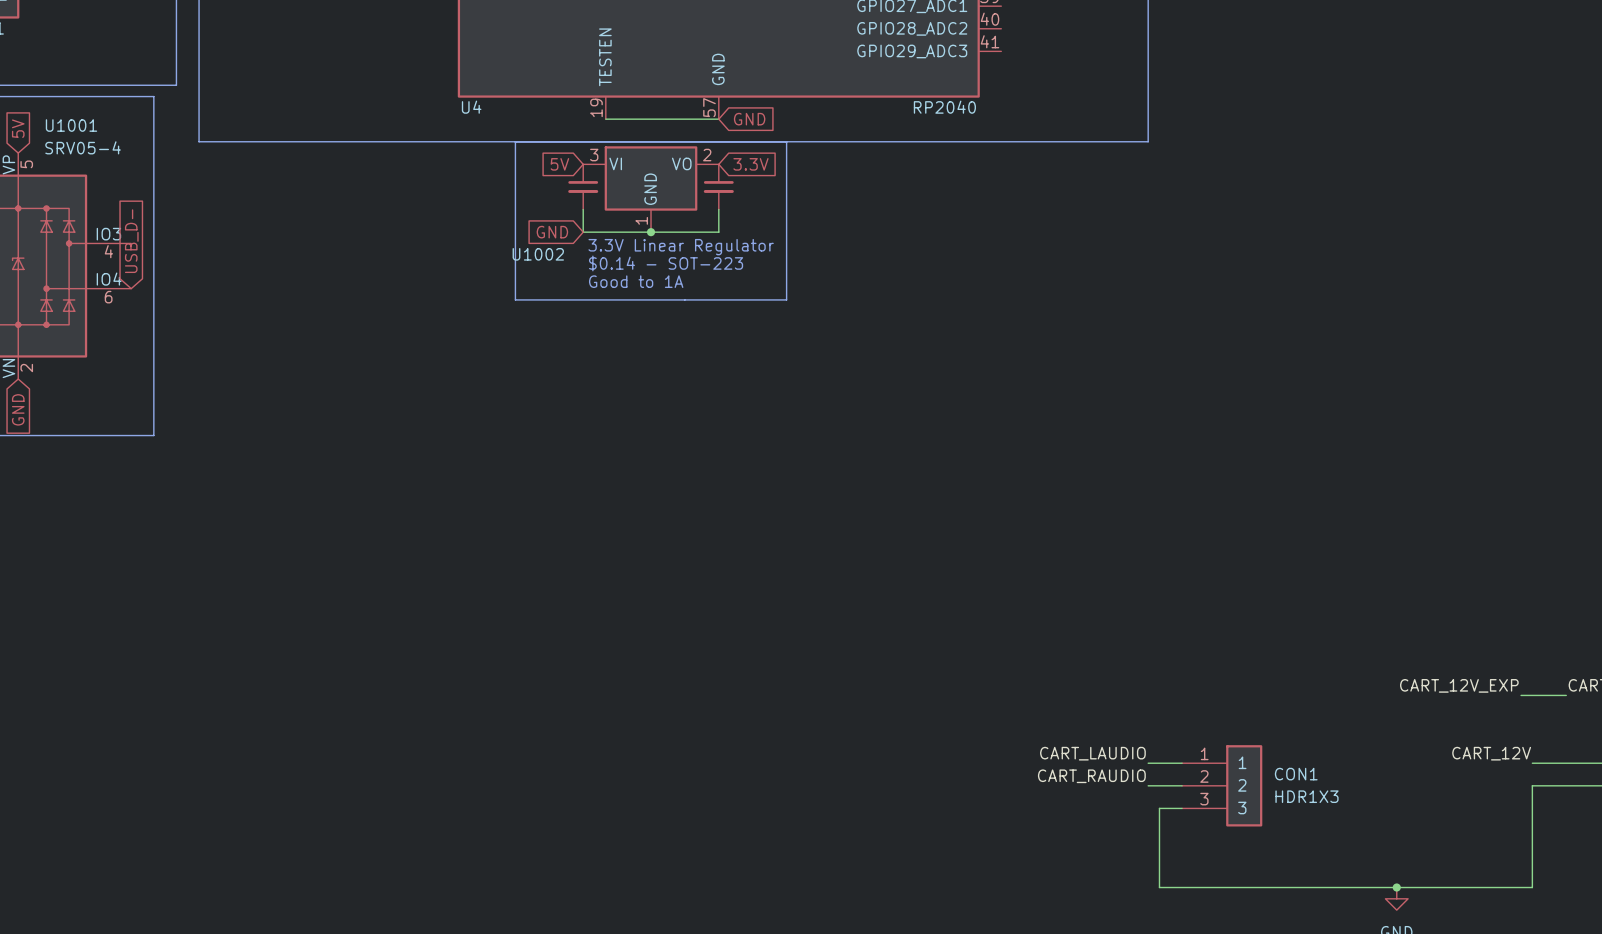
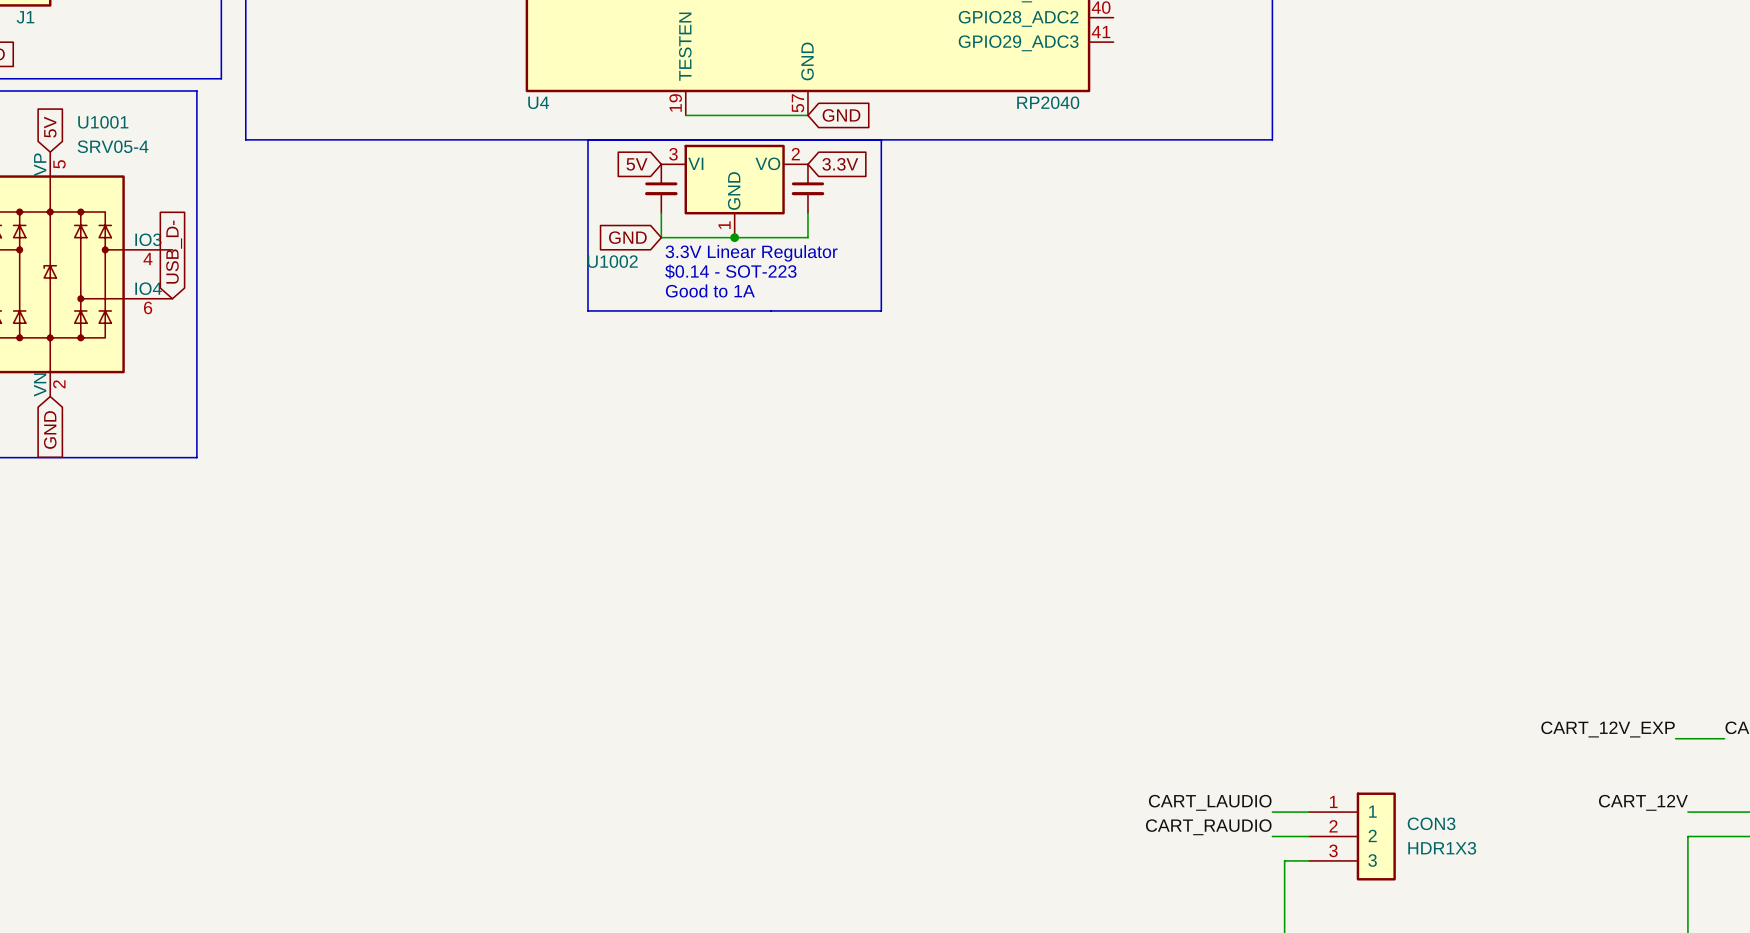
CON1 name: CON1 (1296, 774) -> CON3 (1431, 823)

